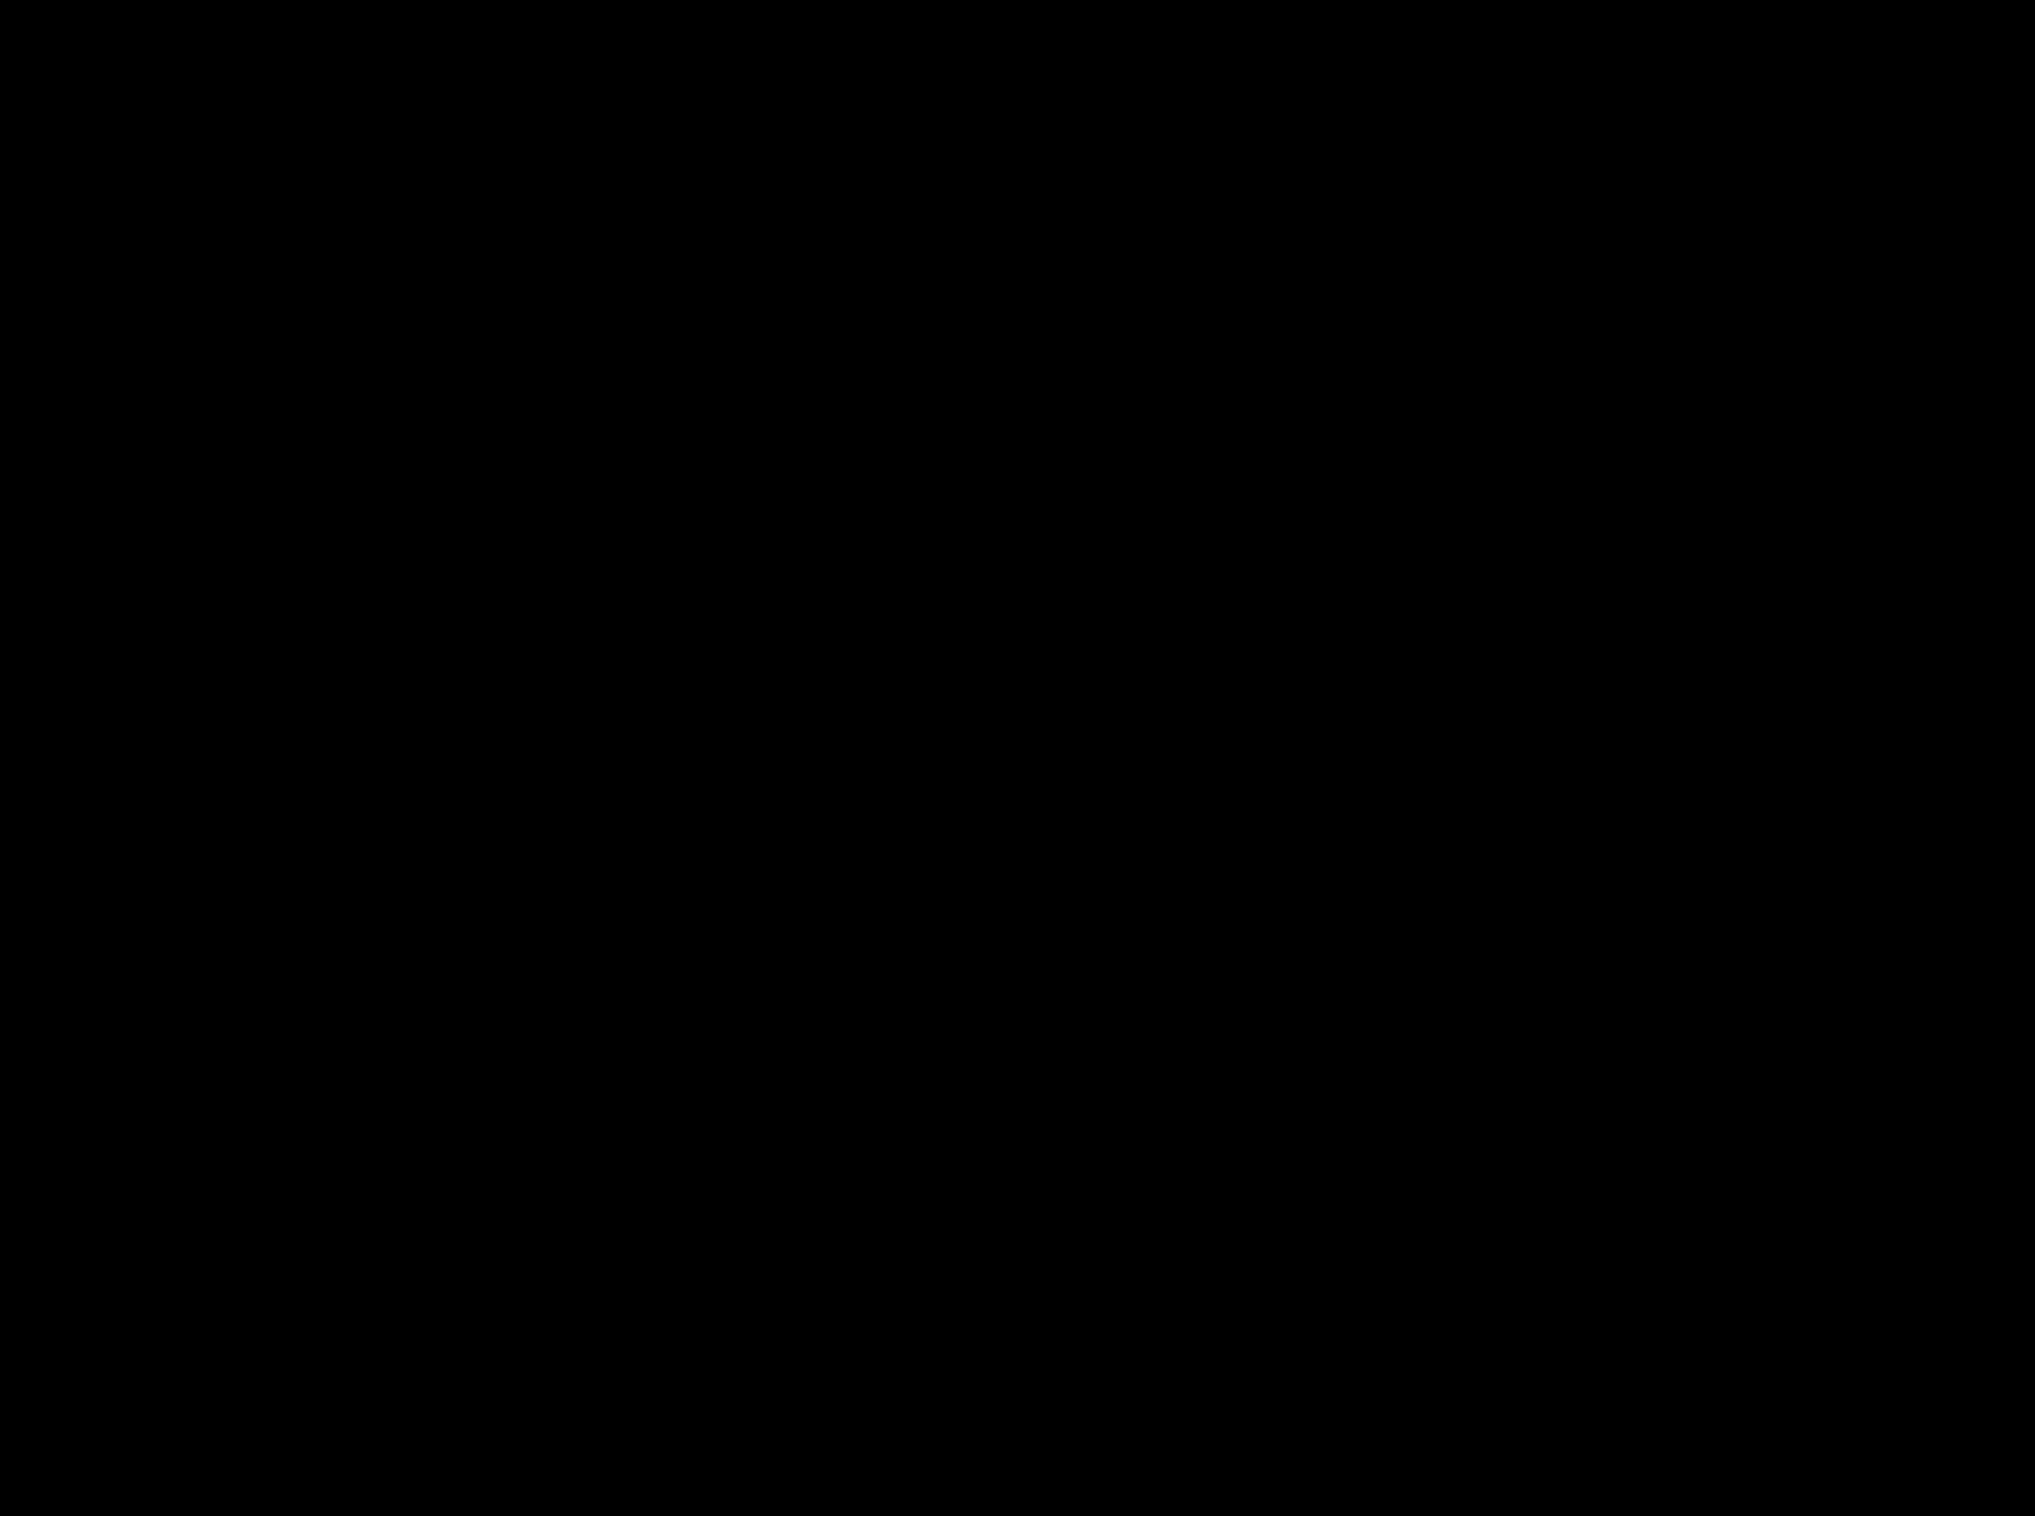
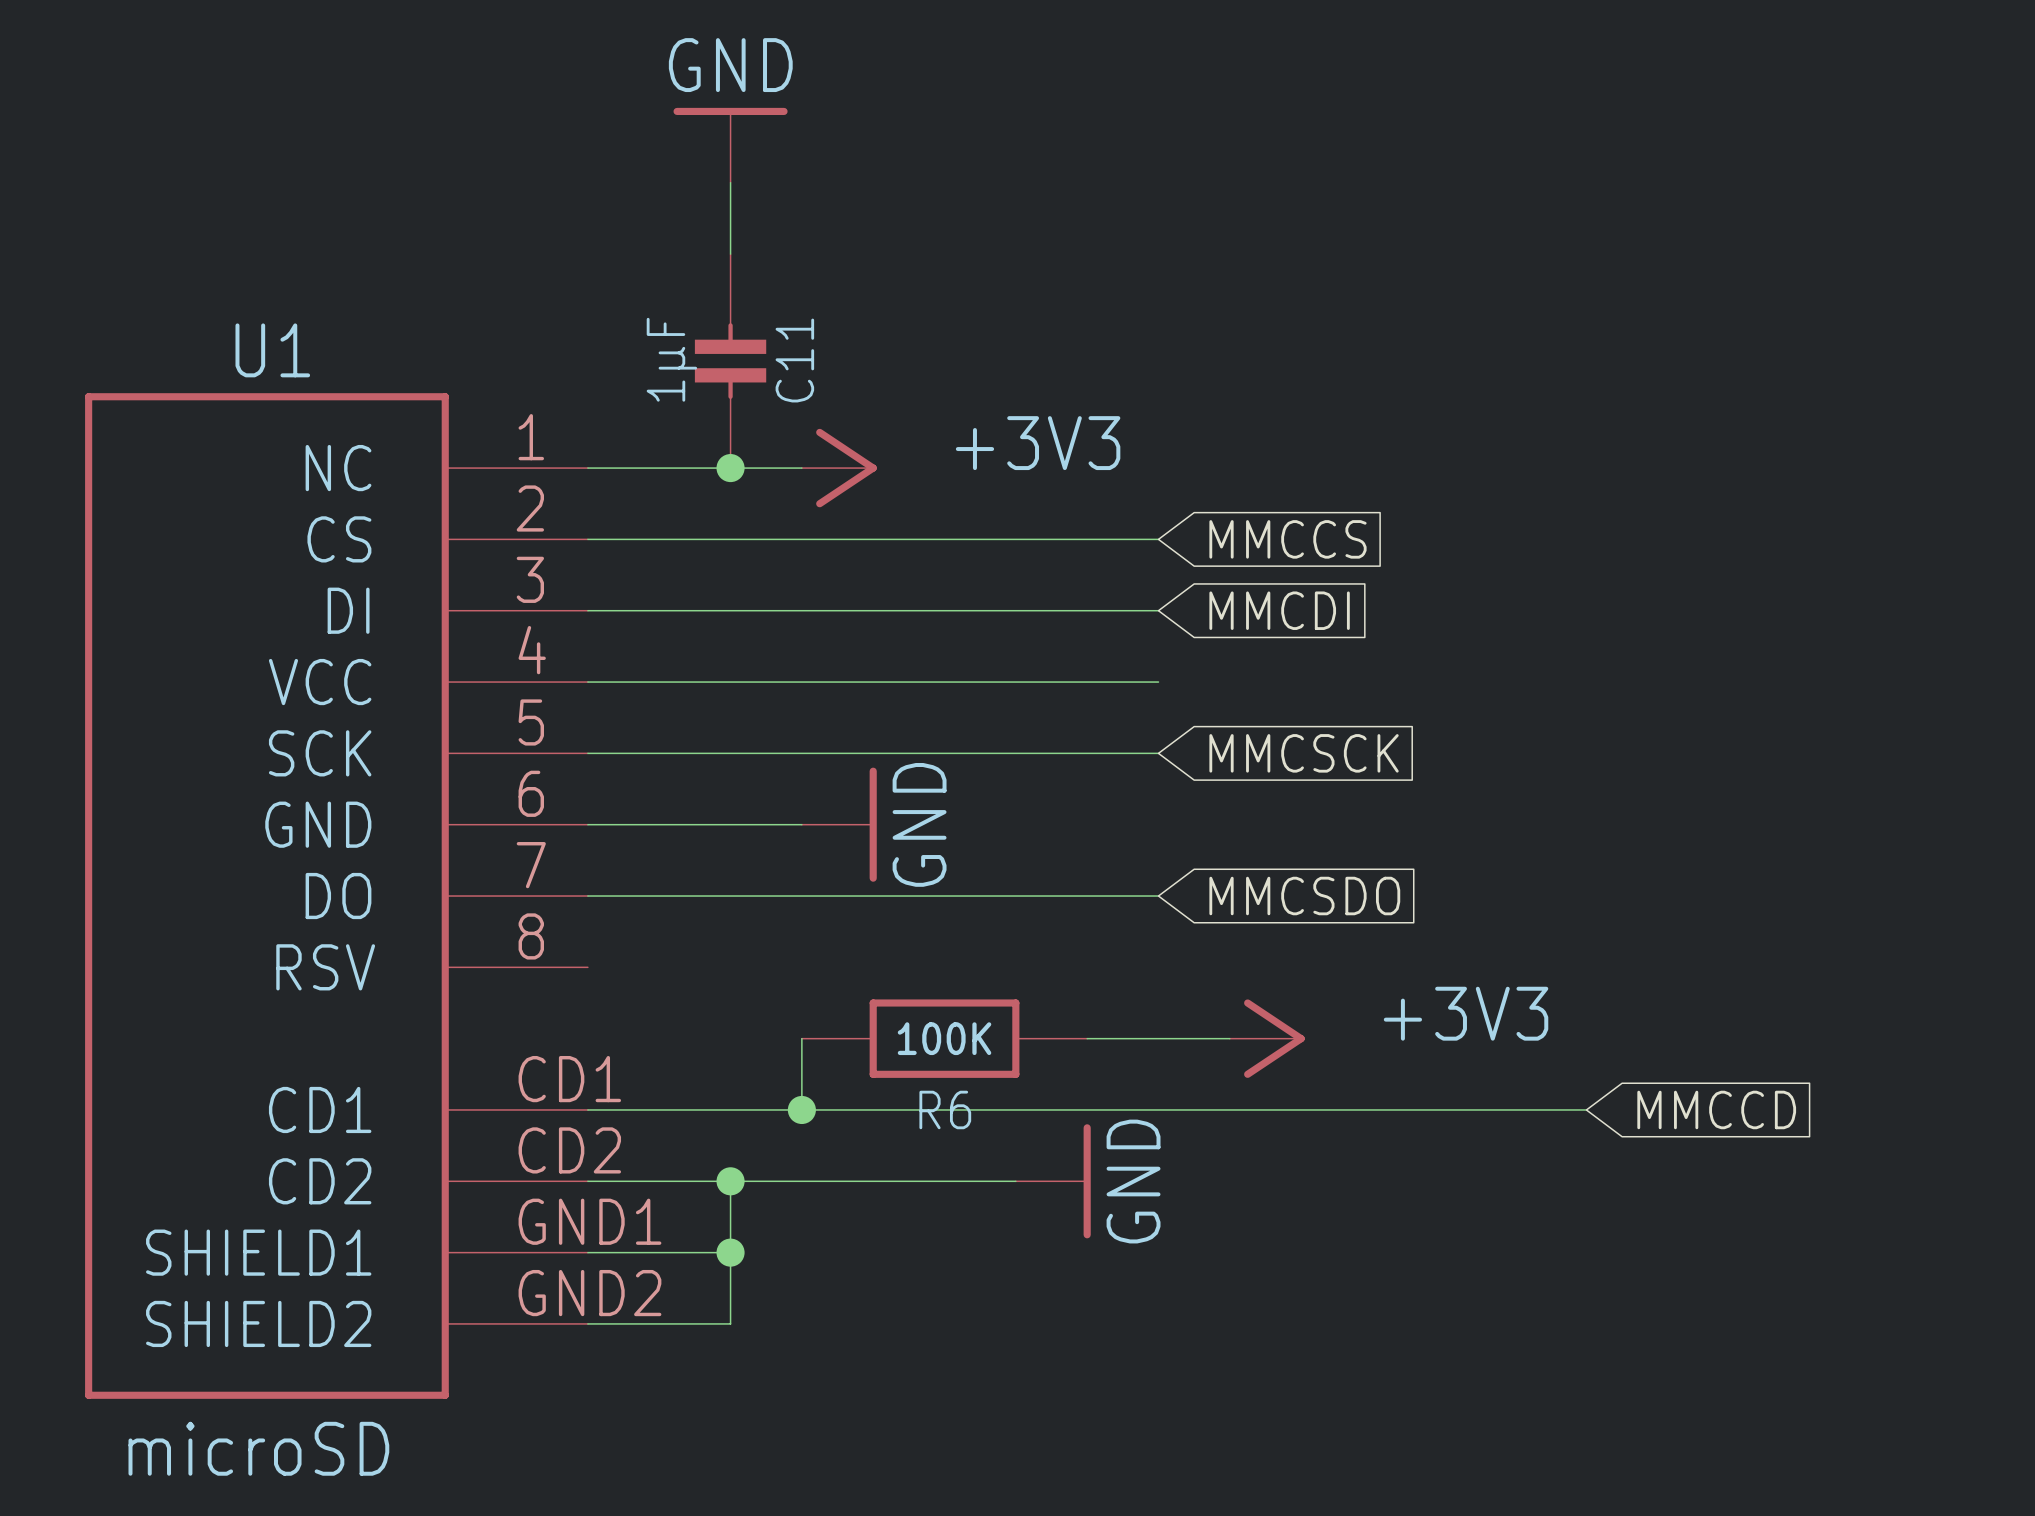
power symbol: none -> GND (730, 145)
wire: none -> (730, 182) (730, 254)
C11: none -> 1µF (730, 361)
wire: none -> (587, 468) (801, 468)
junction: none -> (730, 468)
power symbol: none -> +3V3 (839, 468)
wire: none -> (587, 539) (1158, 539)
global label: none -> MMCCS (1287, 539)
wire: none -> (587, 610) (1158, 610)
global label: none -> MMCDI (1279, 610)
wire: none -> (587, 682) (1158, 682)
wire: none -> (587, 753) (1158, 753)
global label: none -> MMCSCK (1304, 753)
wire: none -> (587, 824) (801, 824)
power symbol: none -> GND (839, 824)
U1: none -> microSD (336, 896)
wire: none -> (587, 896) (1158, 896)
global label: none -> MMCSDO (1304, 896)
wire: none -> (801, 1038) (801, 1109)
R6: none -> 100K (944, 1038)
wire: none -> (1087, 1038) (1229, 1038)
power symbol: none -> +3V3 (1267, 1038)
wire: none -> (587, 1109) (1586, 1109)
junction: none -> (801, 1109)
global label: none -> MMCCD (1716, 1109)
wire: none -> (587, 1181) (1015, 1181)
wire: none -> (730, 1181) (730, 1323) (587, 1323)
junction: none -> (730, 1181)
power symbol: none -> GND (1053, 1181)
wire: none -> (587, 1252) (730, 1252)
junction: none -> (730, 1252)

